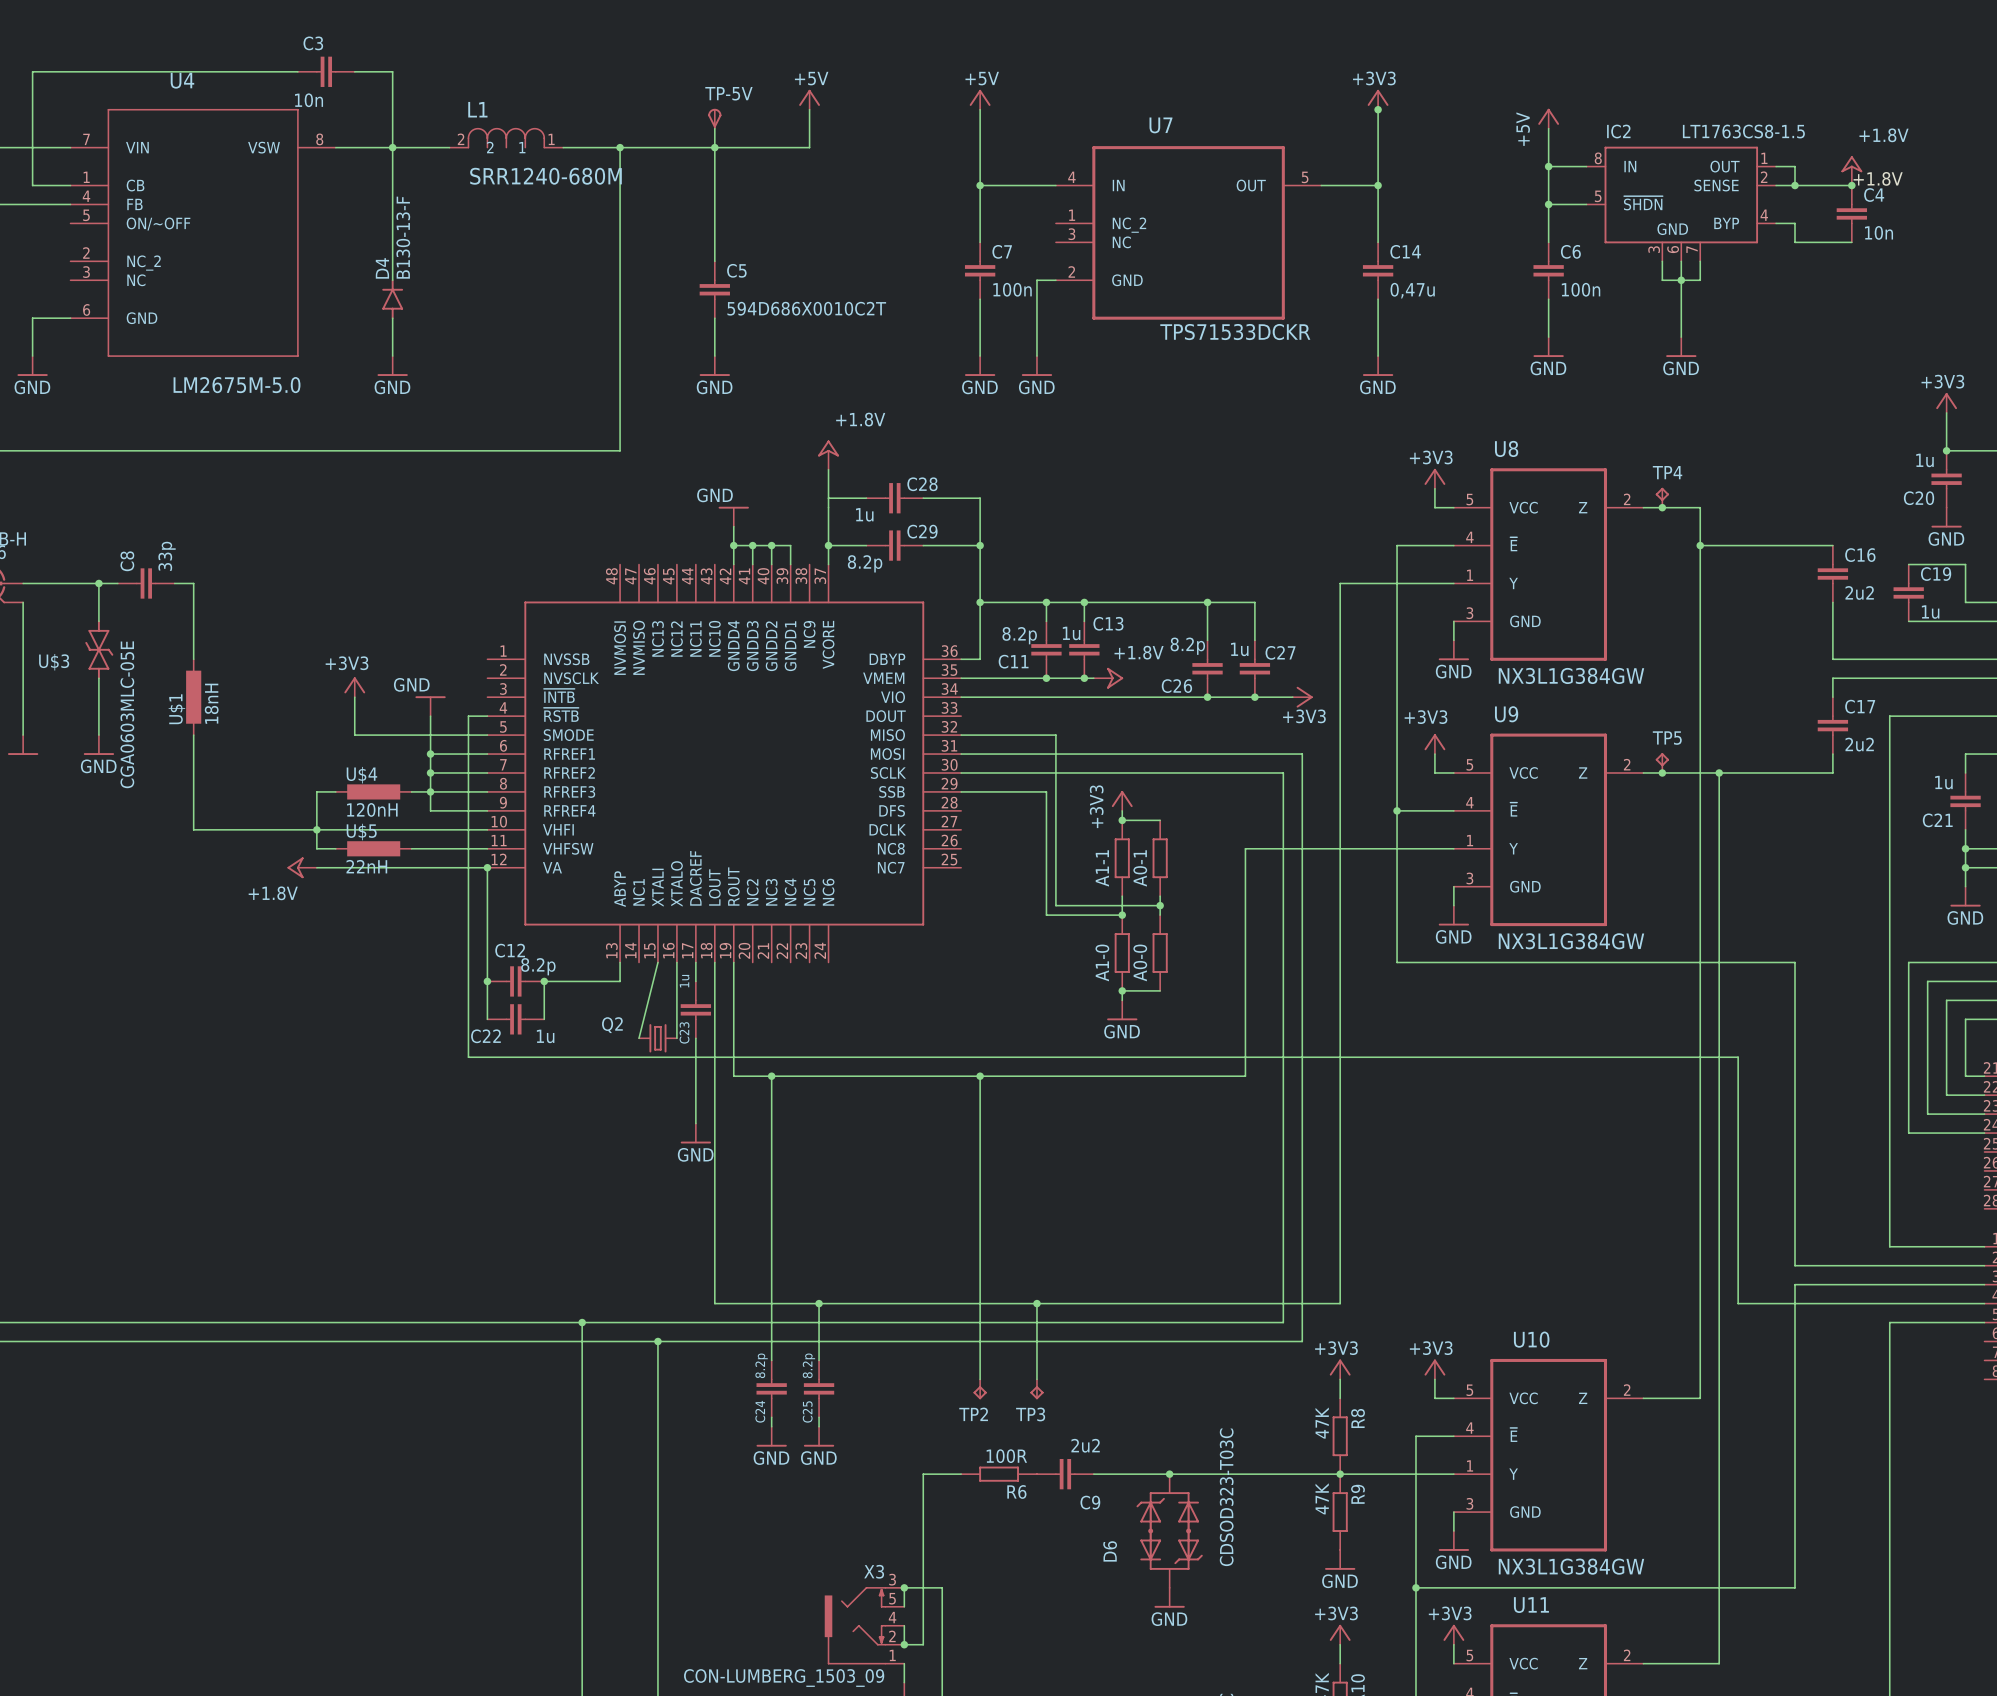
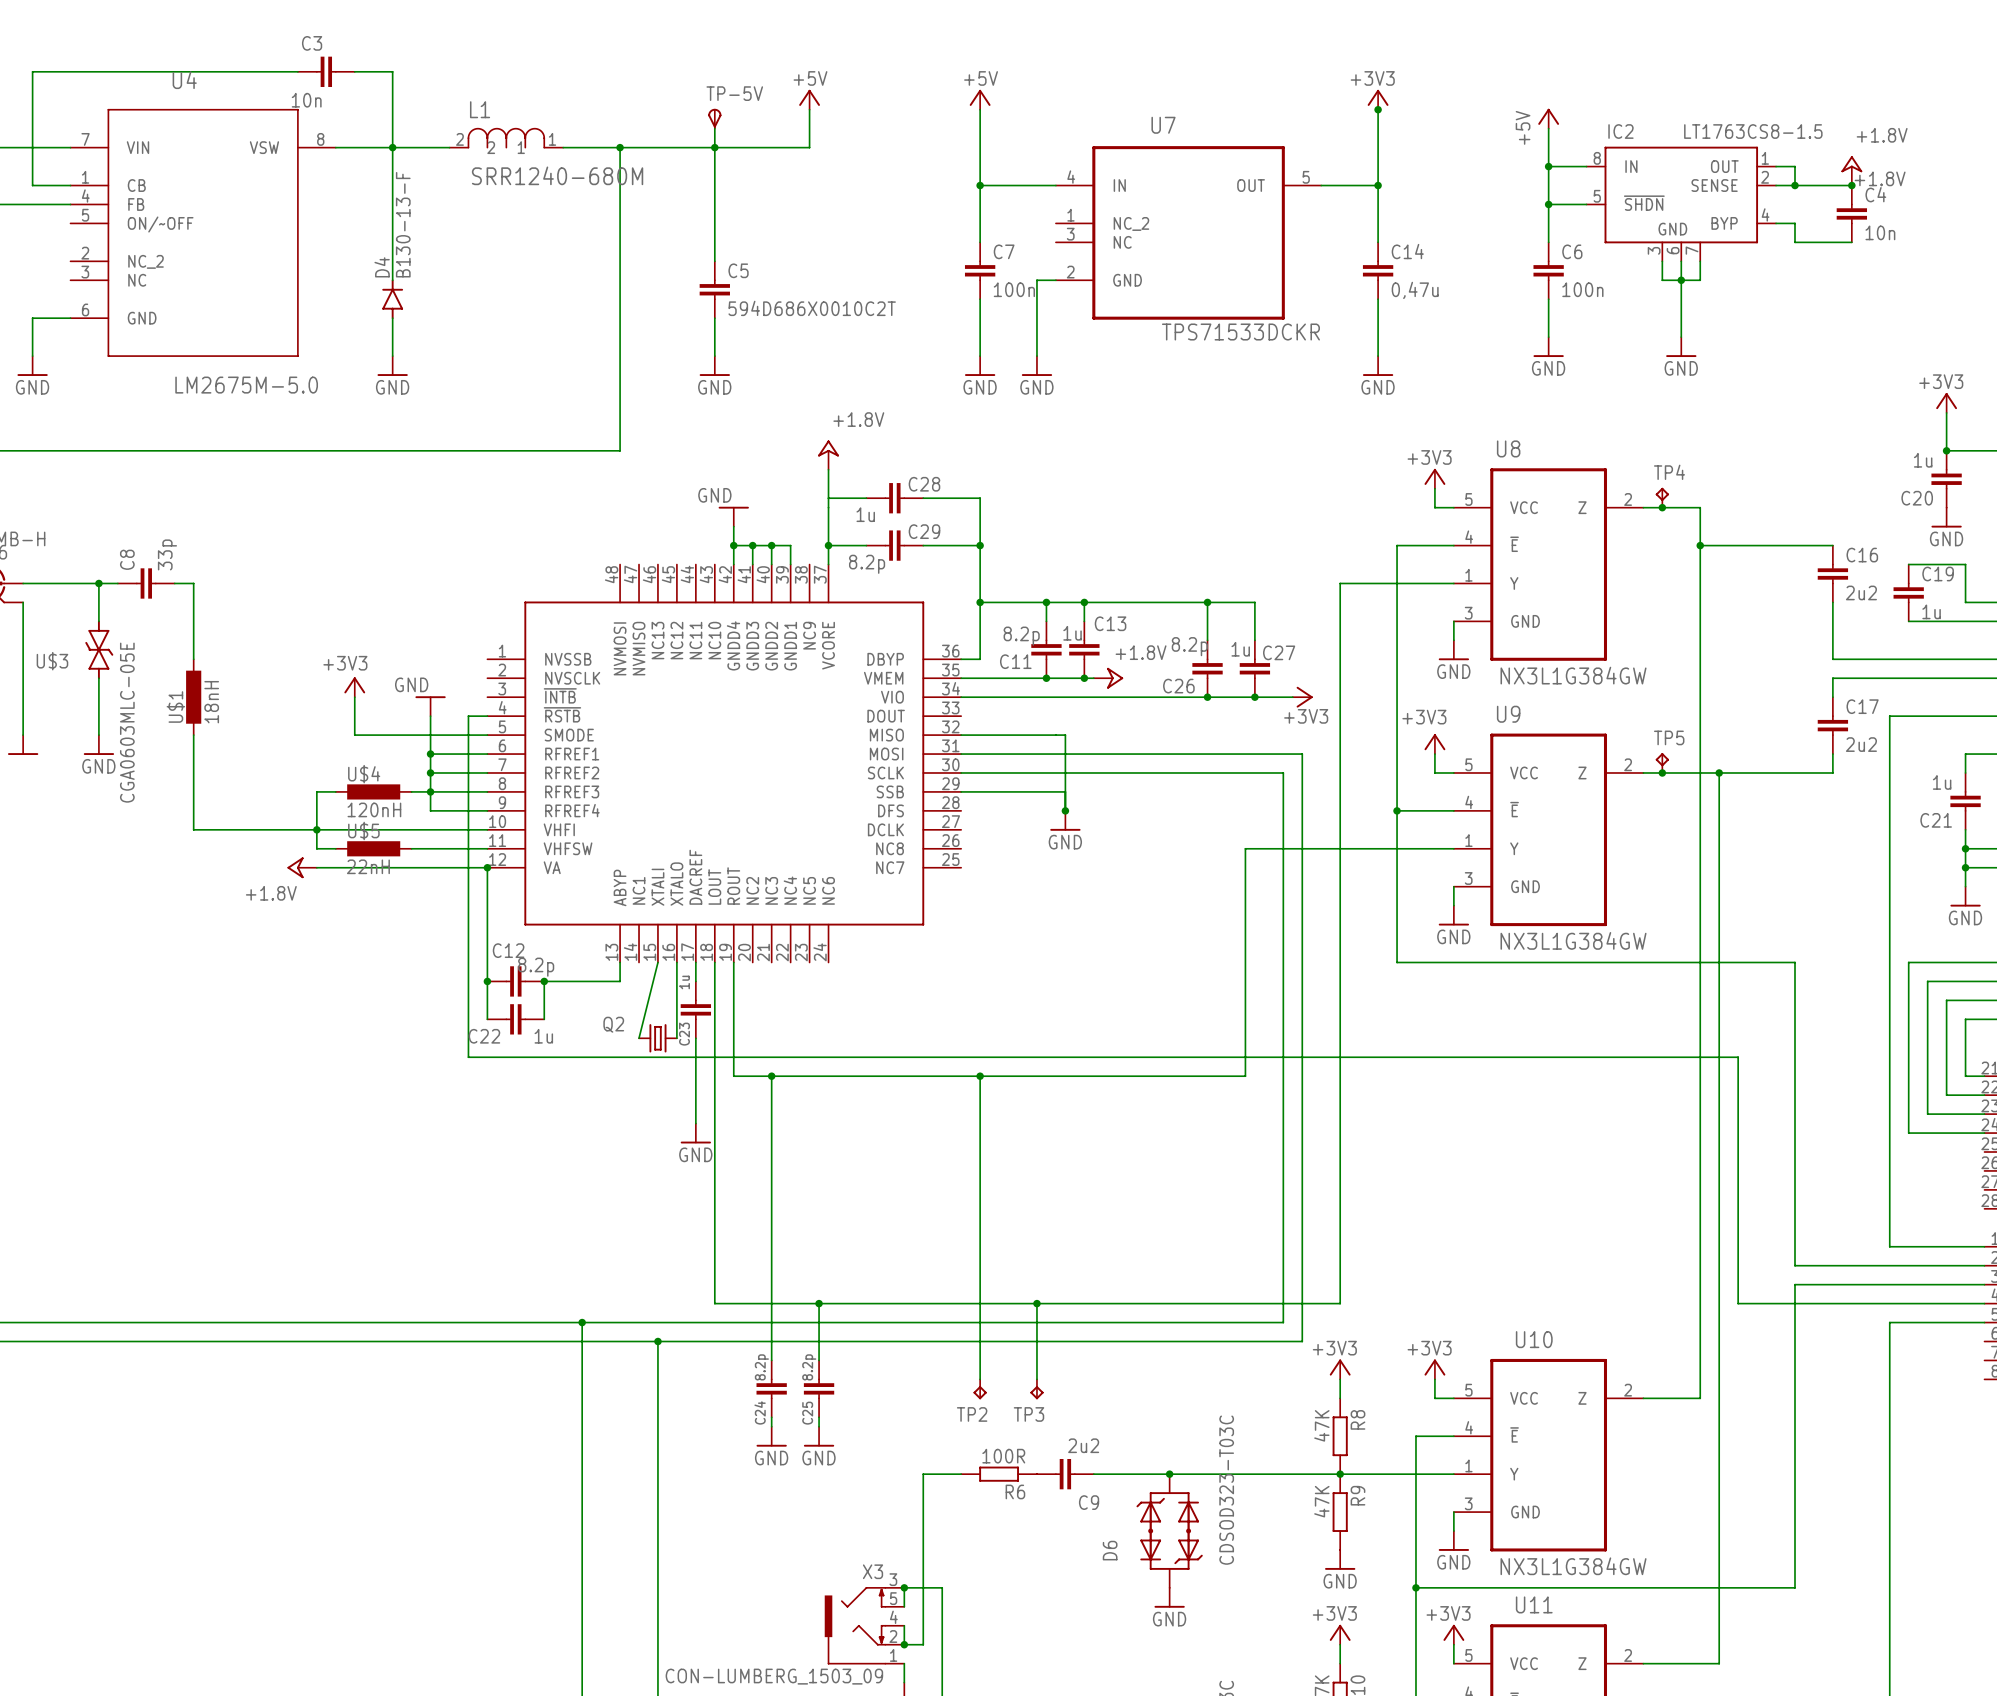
wire: (1055, 735) (1055, 905) (1160, 905) -> (1055, 735) (1065, 735) (1065, 810)
wire: (1046, 791) (1046, 915) (1122, 915) (1122, 896) -> (1046, 791) (1065, 791)
power symbol: +3V3 (1122, 800) -> none
junction: none -> (1065, 810)
wire: (1122, 810) (1122, 820) (1160, 820) -> none
power symbol: none -> GND (1065, 820)
junction: (1122, 820) -> none
part: A1-1 (1122, 858) -> none
part: A0-1 (1160, 858) -> none
wire: (1160, 896) (1160, 915) -> none
junction: (1160, 905) -> none
junction: (1122, 915) -> none
part: A1-0 (1122, 953) -> none
part: A0-0 (1160, 953) -> none
junction: (1122, 990) -> none
wire: (1160, 990) (1122, 990) (1122, 1000) -> none
power symbol: GND (1122, 1010) -> none

